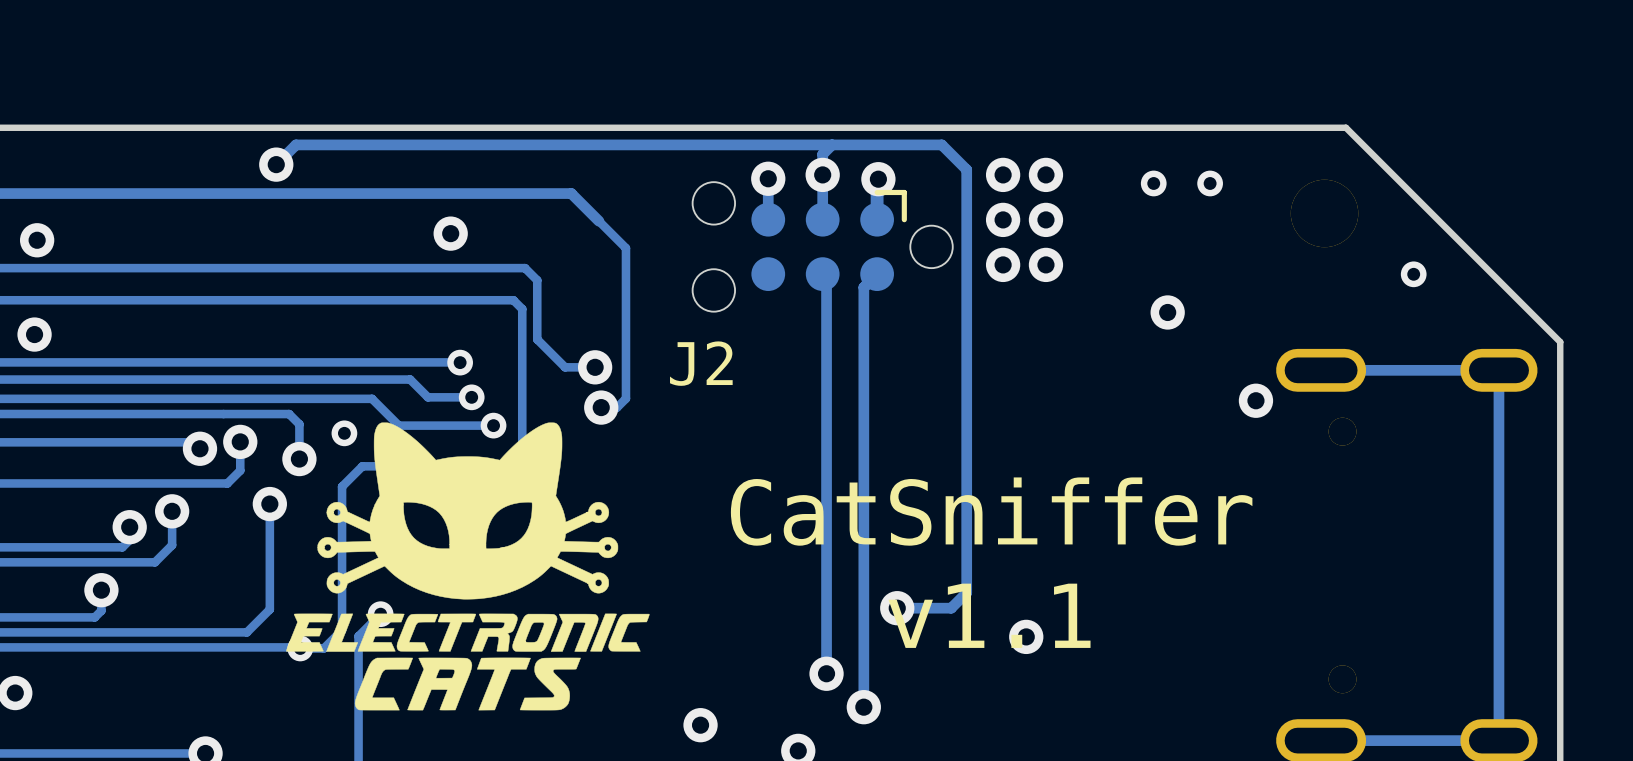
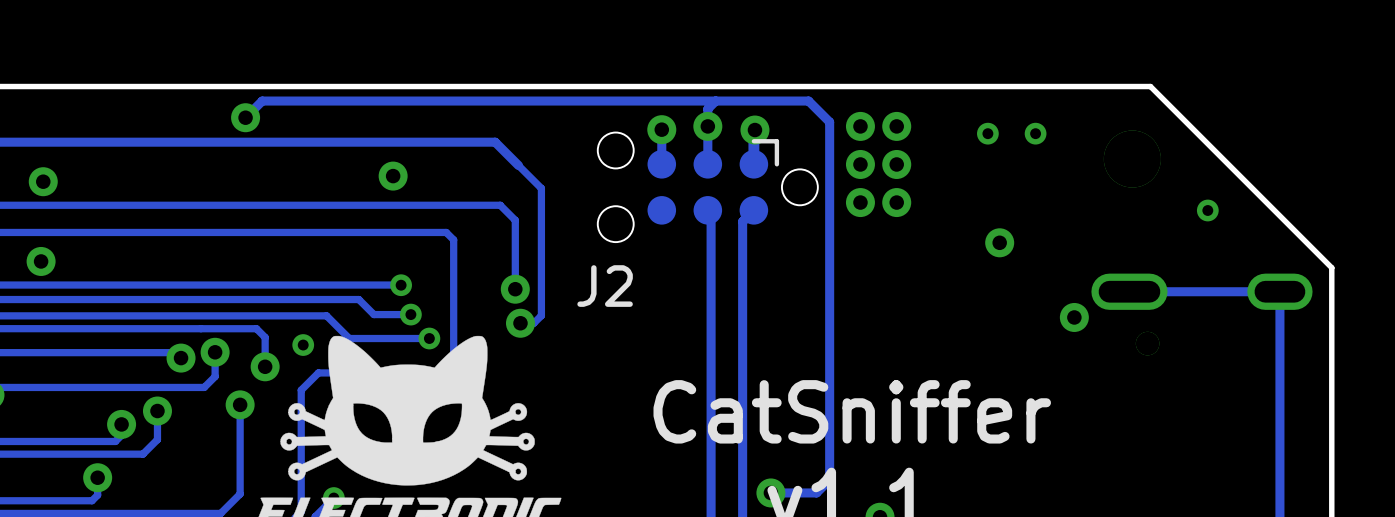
track: (525, 268) (537, 280) (537, 339) (565, 367) (595, 367) -> (456, 205) (500, 205) (515, 220) (515, 289)

